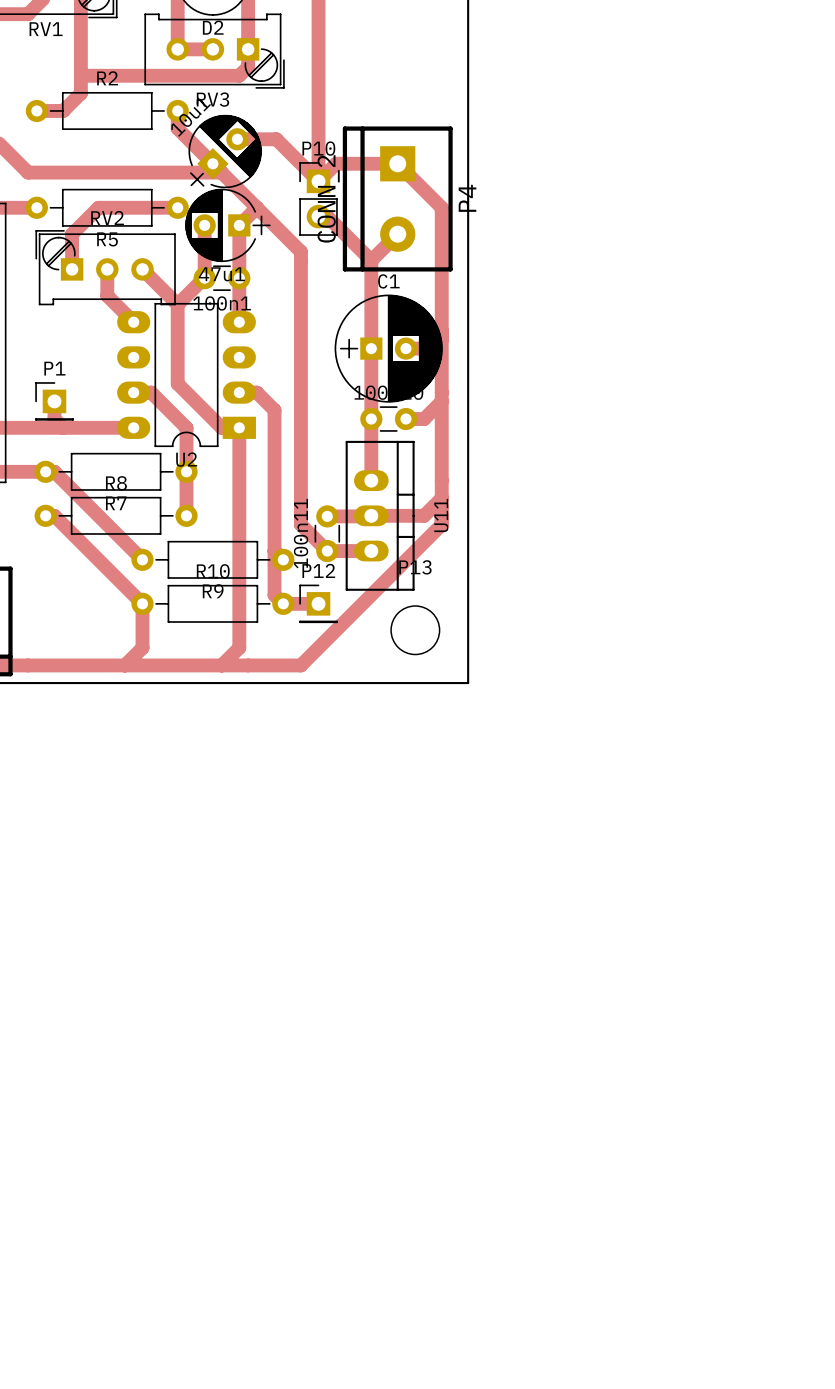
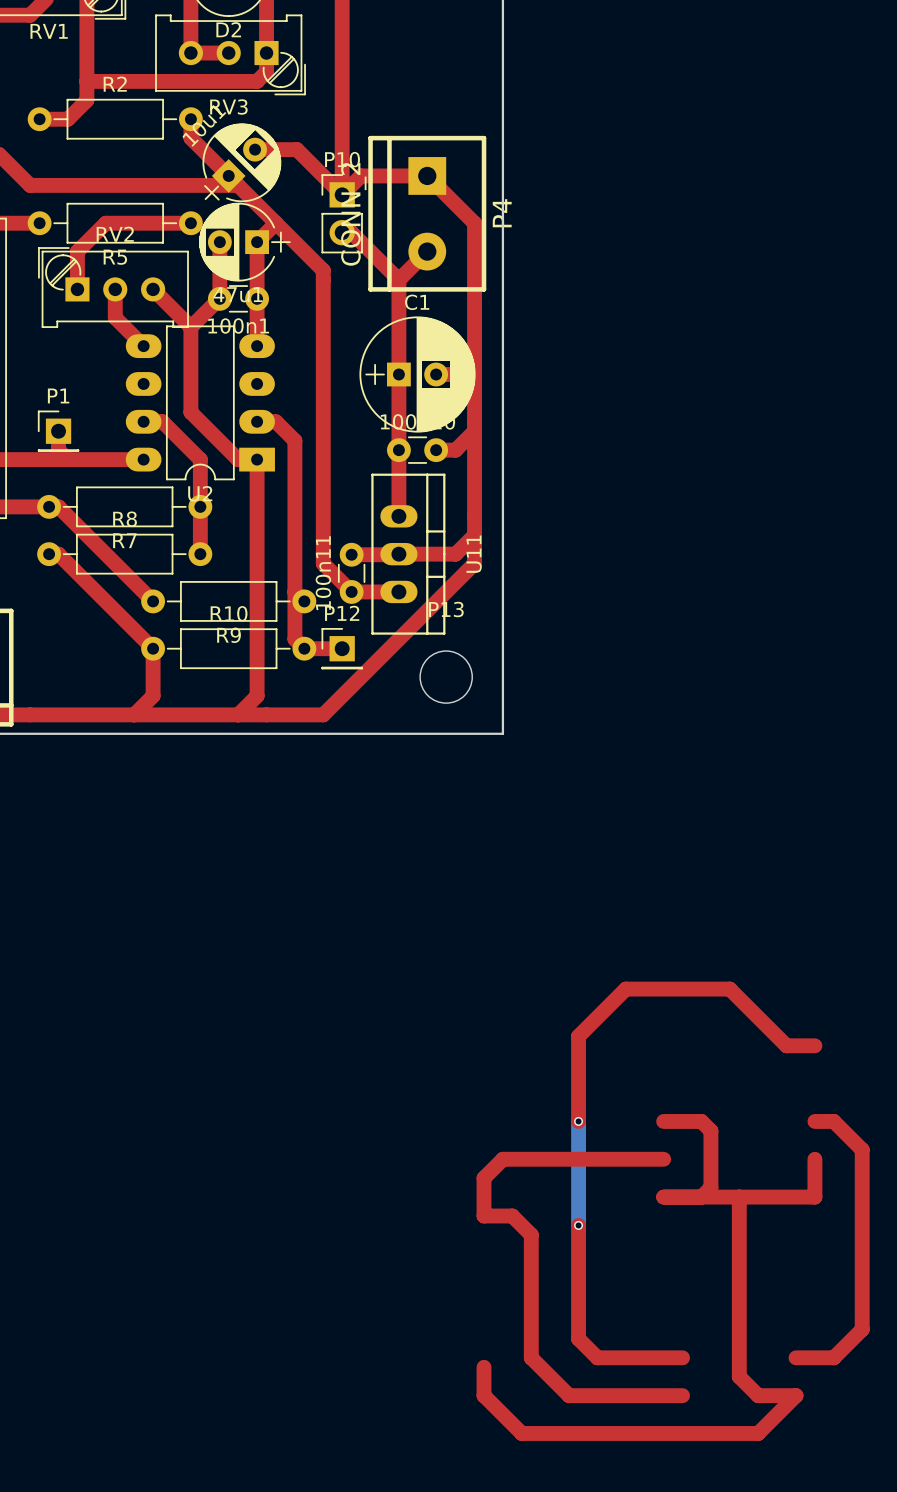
top track: none -> (814, 1045) (786, 1045) (729, 989) (625, 989) (578, 1036) (578, 1121)
bottom track: none -> (578, 1121) (578, 1225)
via: none -> (578, 1121)
top track: none -> (663, 1121) (701, 1121) (710, 1130) (710, 1187) (701, 1197)
top track: none -> (814, 1121) (833, 1121) (862, 1149) (862, 1329) (833, 1357) (796, 1357)
top track: none -> (663, 1159) (502, 1159) (484, 1178) (484, 1216) (512, 1216) (531, 1234) (531, 1357) (569, 1395) (682, 1395)
top track: none -> (814, 1159) (814, 1197) (663, 1197)
top track: none -> (739, 1197) (739, 1376) (758, 1395) (796, 1395) (758, 1433) (521, 1433) (484, 1395) (484, 1367)
top track: none -> (578, 1225) (578, 1338) (597, 1357) (682, 1357)
via: none -> (578, 1225)

